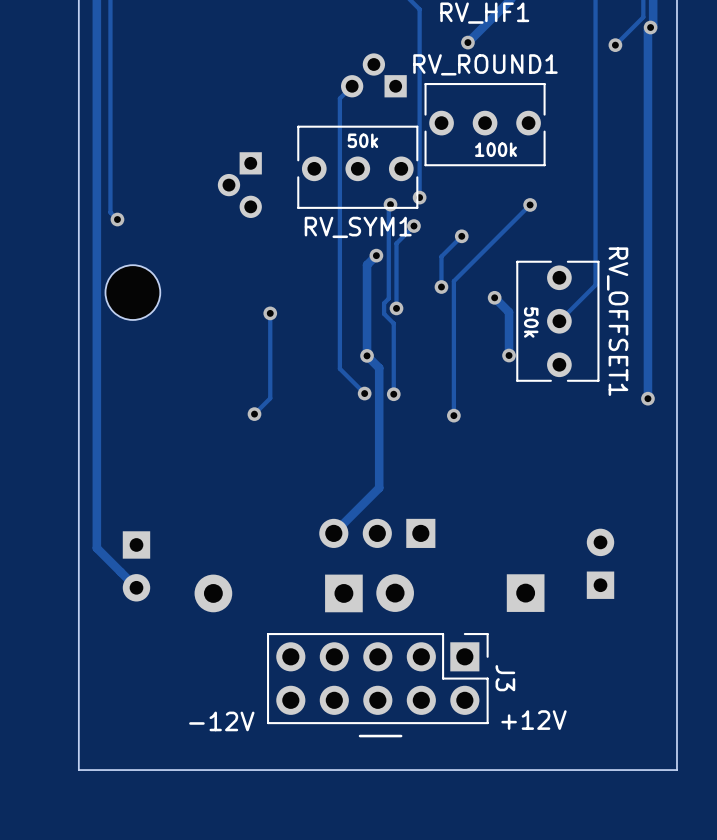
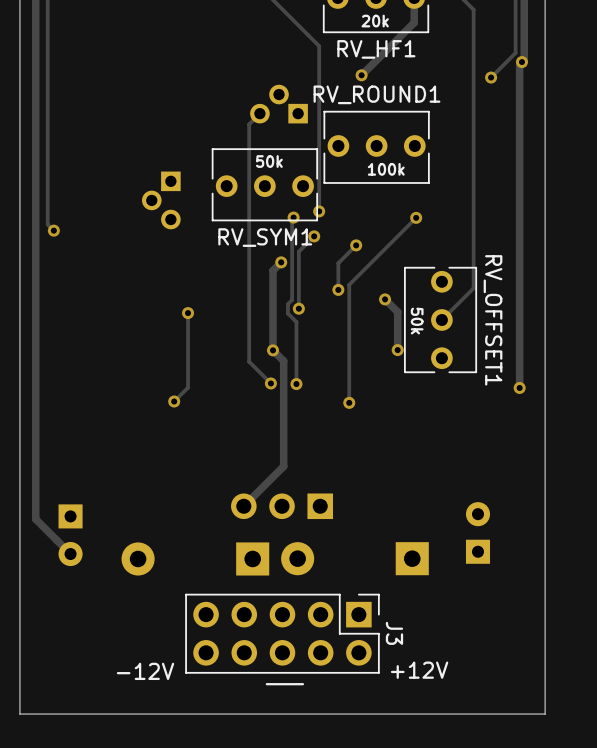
part: (132, 292) -> none

